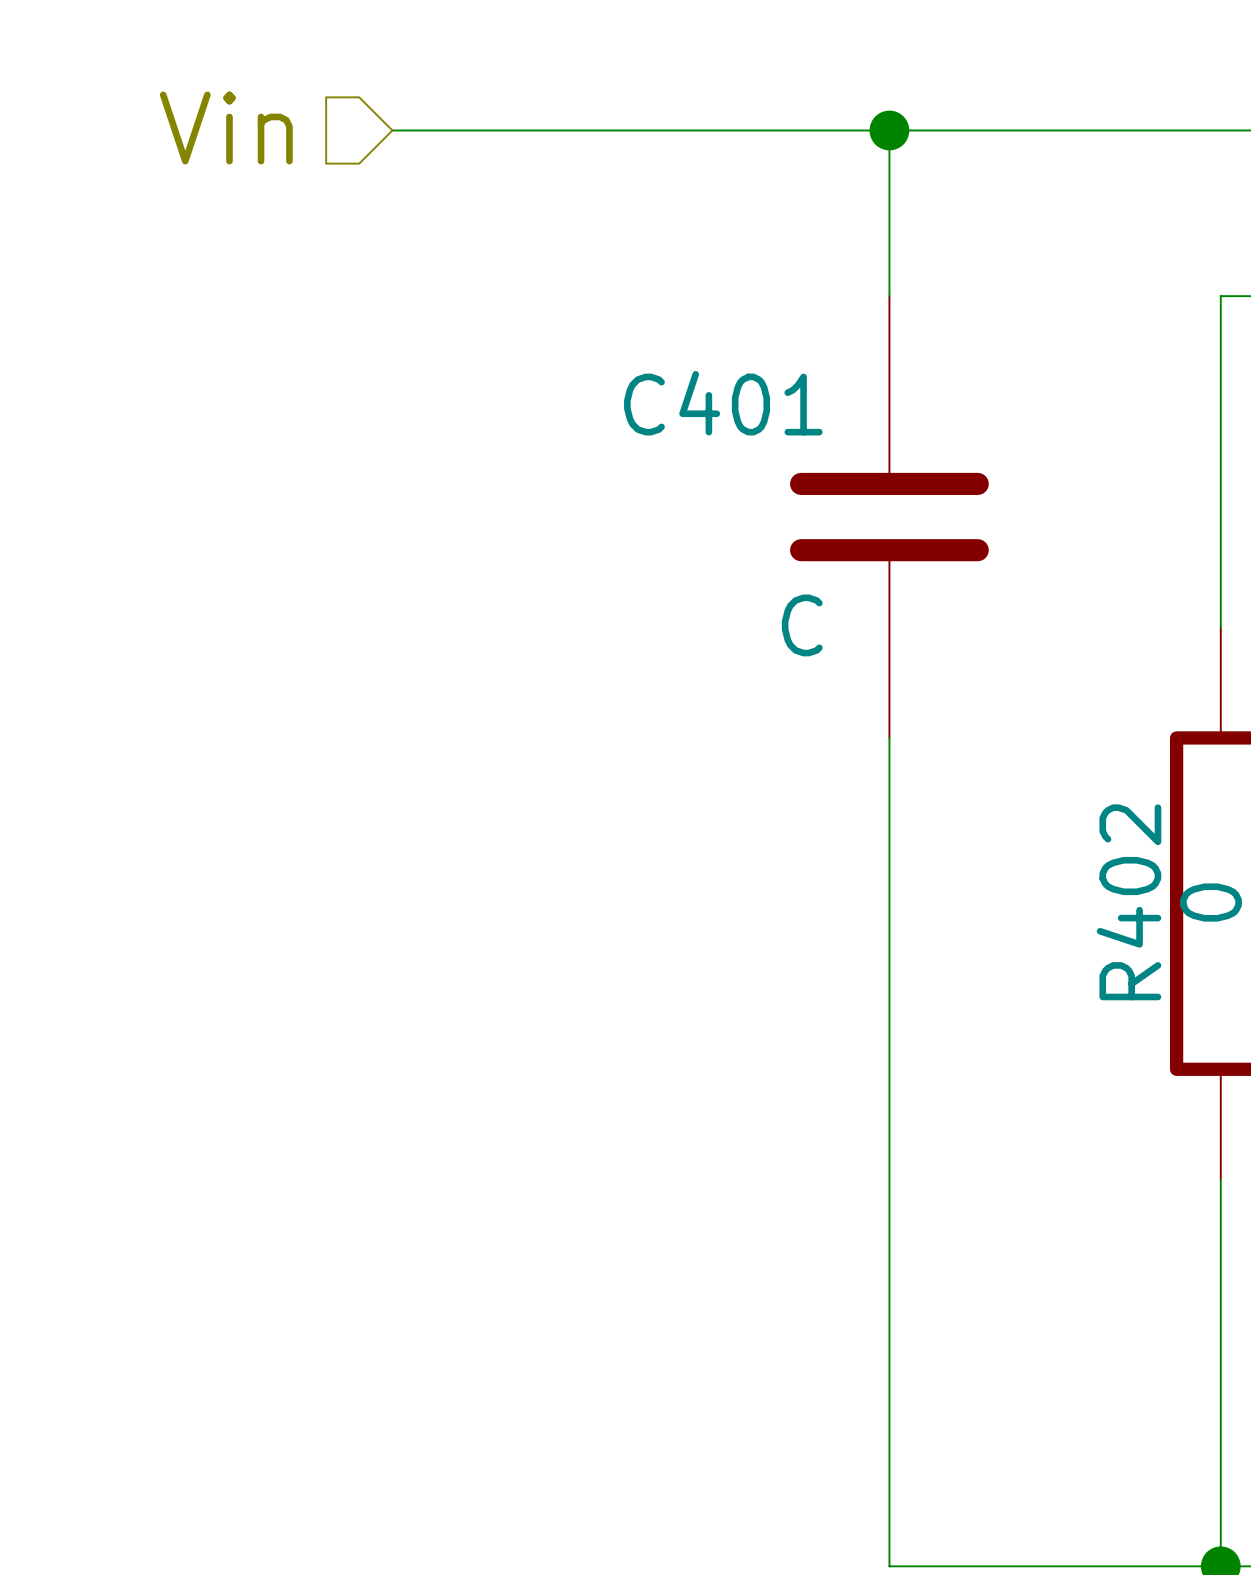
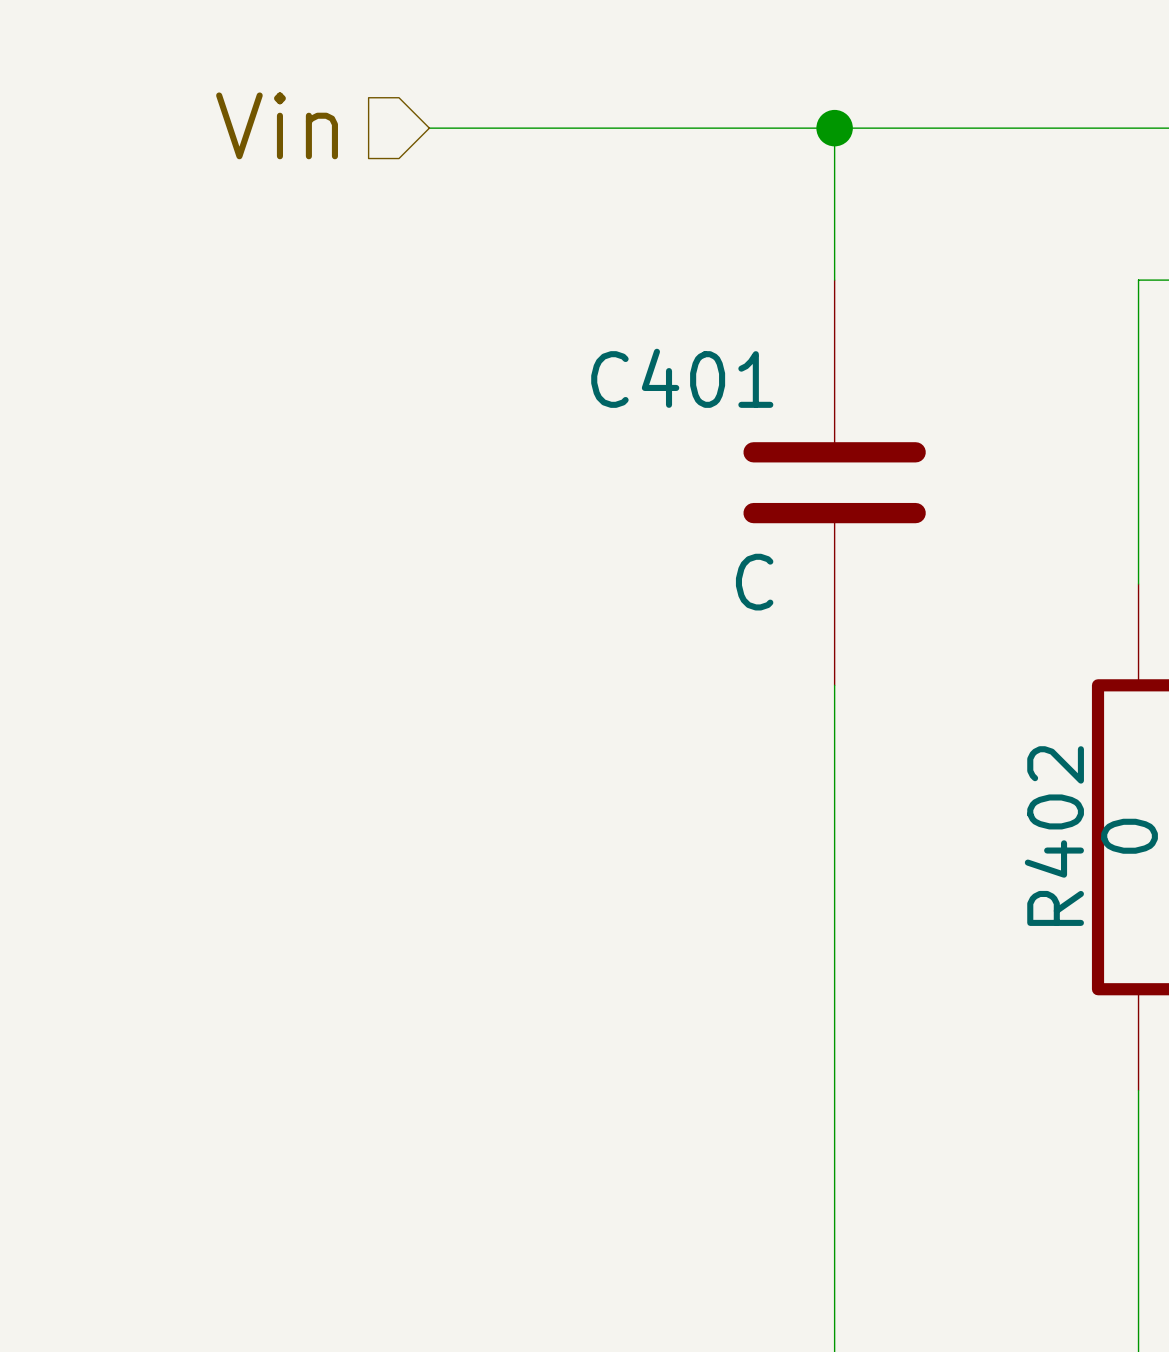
hierarchical label position: Vin (226, 128) -> Vin (277, 125)
wire: (392, 130) (447, 130) -> none

